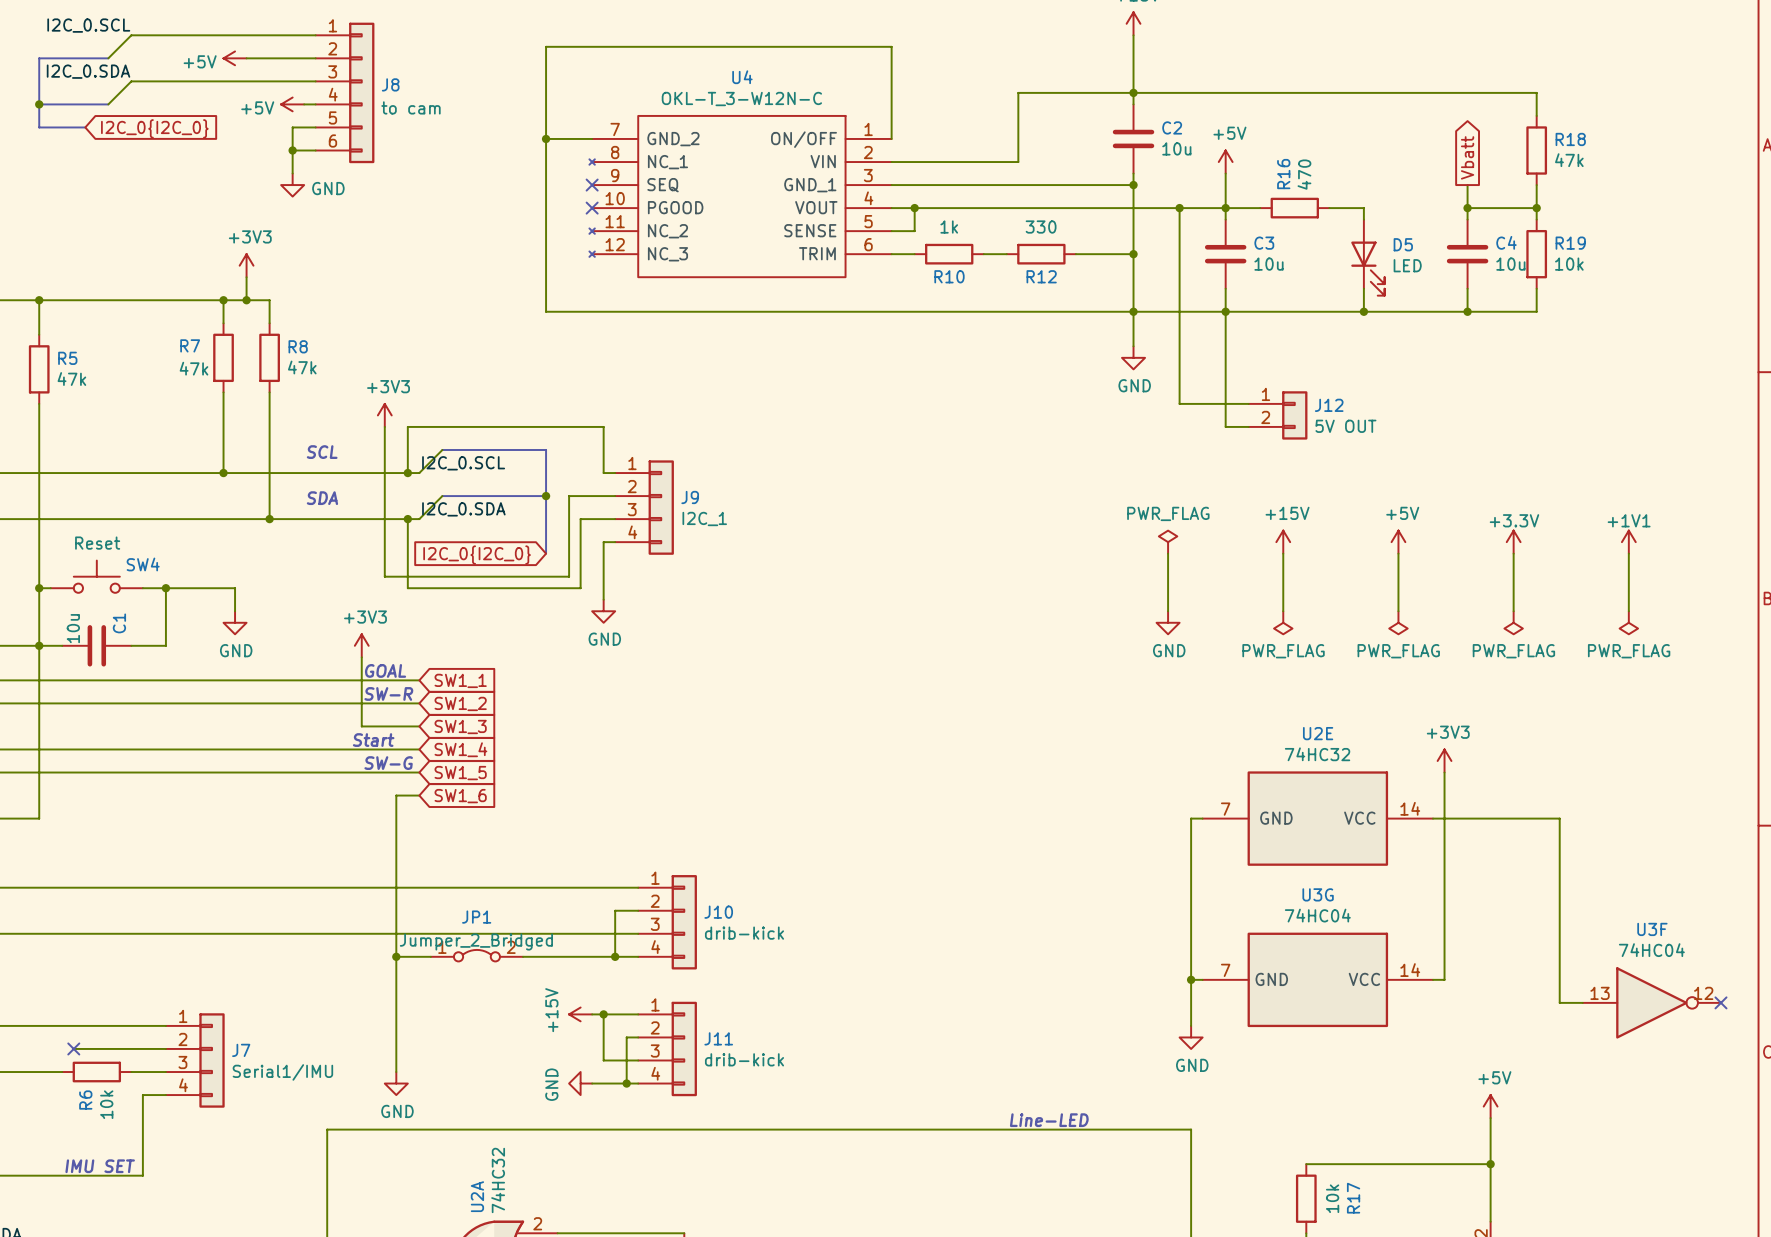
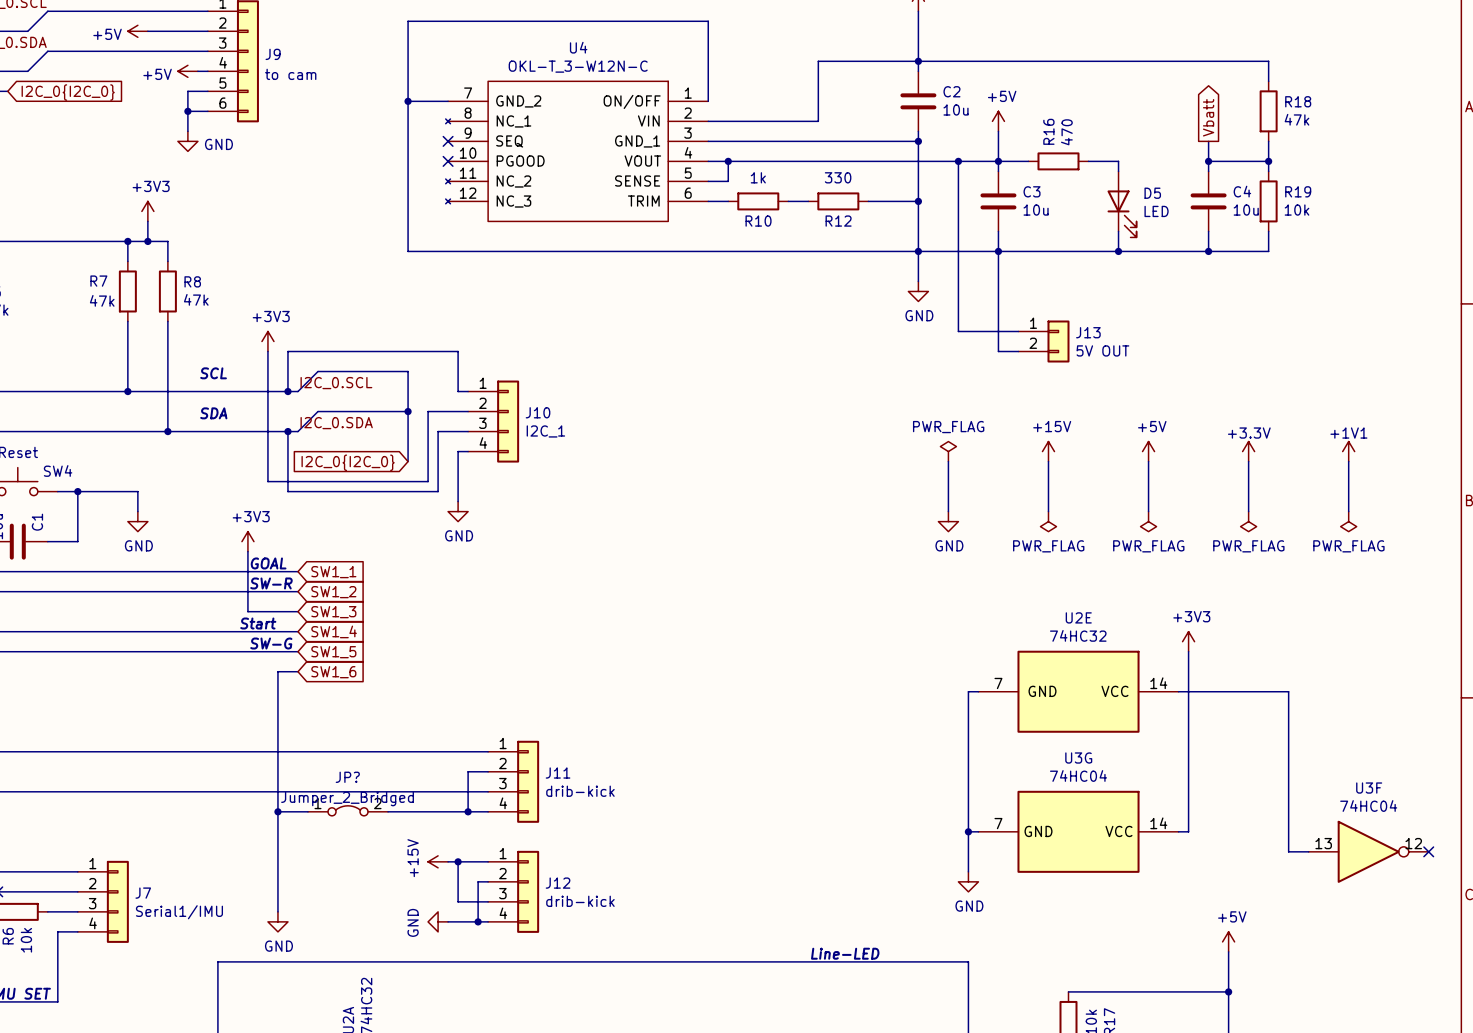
J8 name: J8 (390, 84) -> J9 (273, 54)
J12 name: J12 (1329, 405) -> J13 (1088, 332)
J9 name: J9 (690, 497) -> J10 (538, 412)
J10 name: J10 (718, 912) -> J11 (558, 773)
JP1 name: JP1 (476, 917) -> JP? (347, 777)
J11 name: J11 (718, 1038) -> J12 (558, 883)

